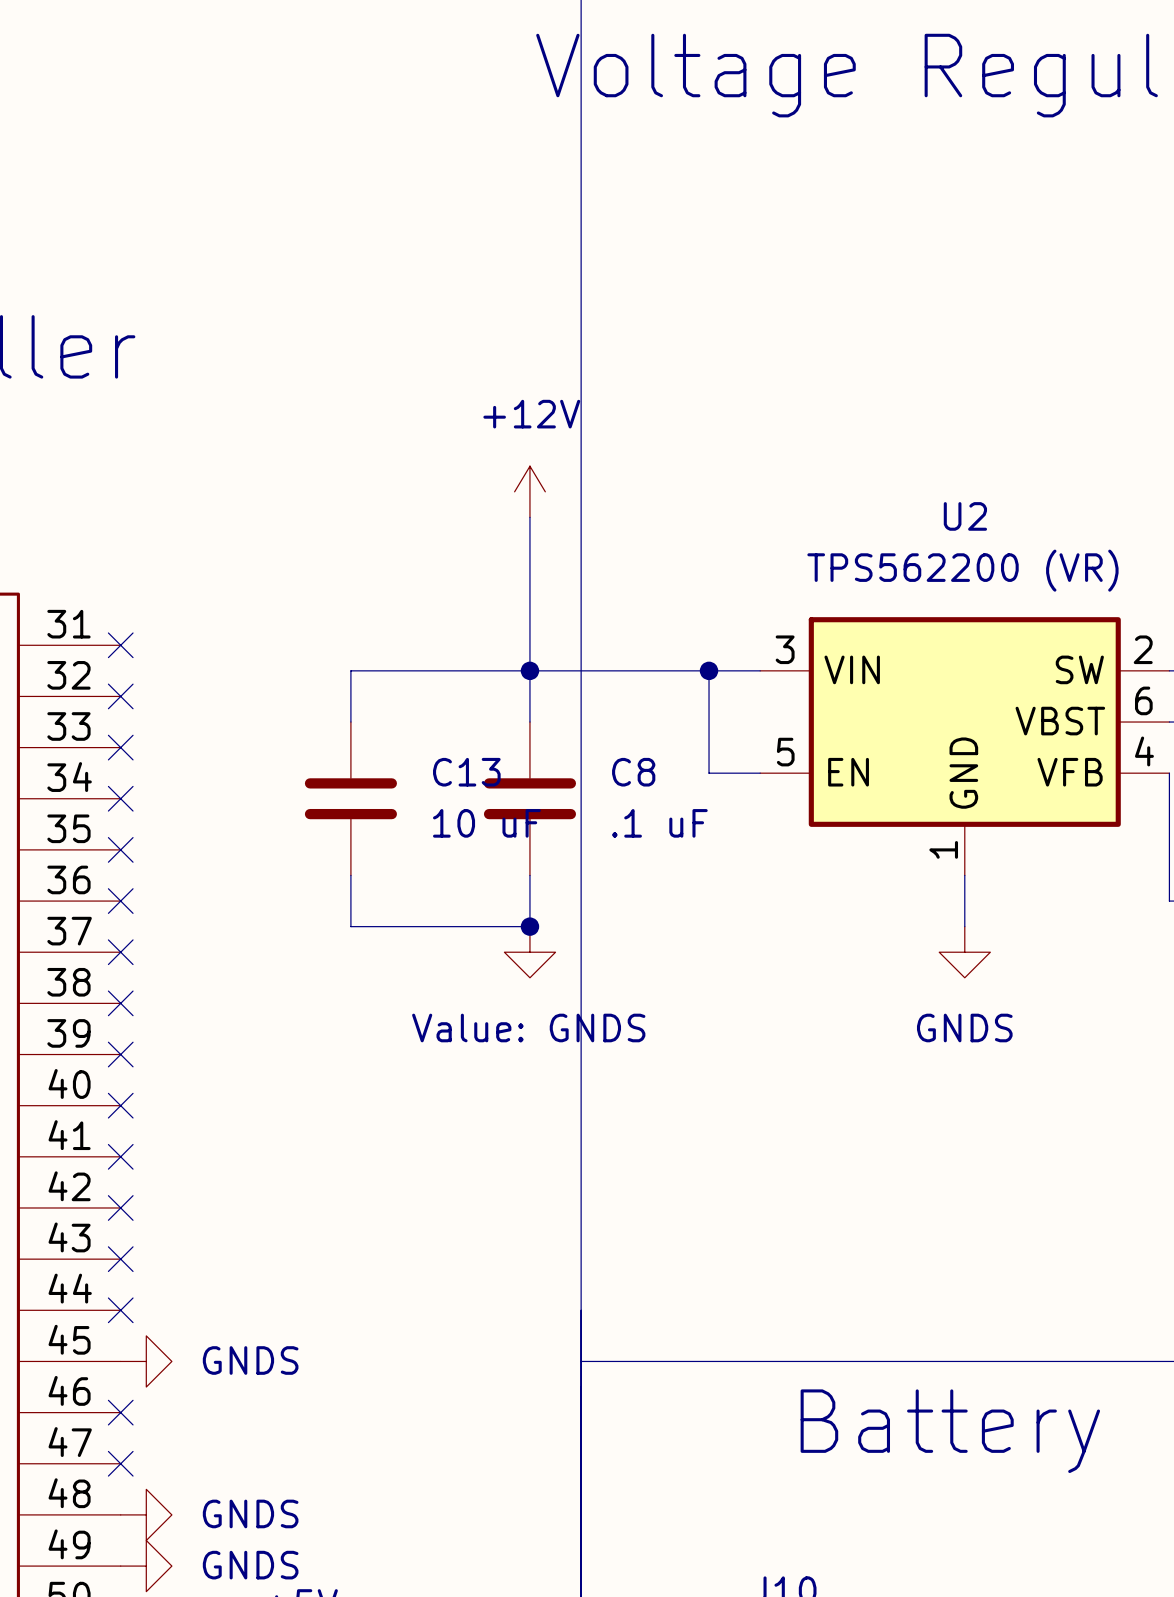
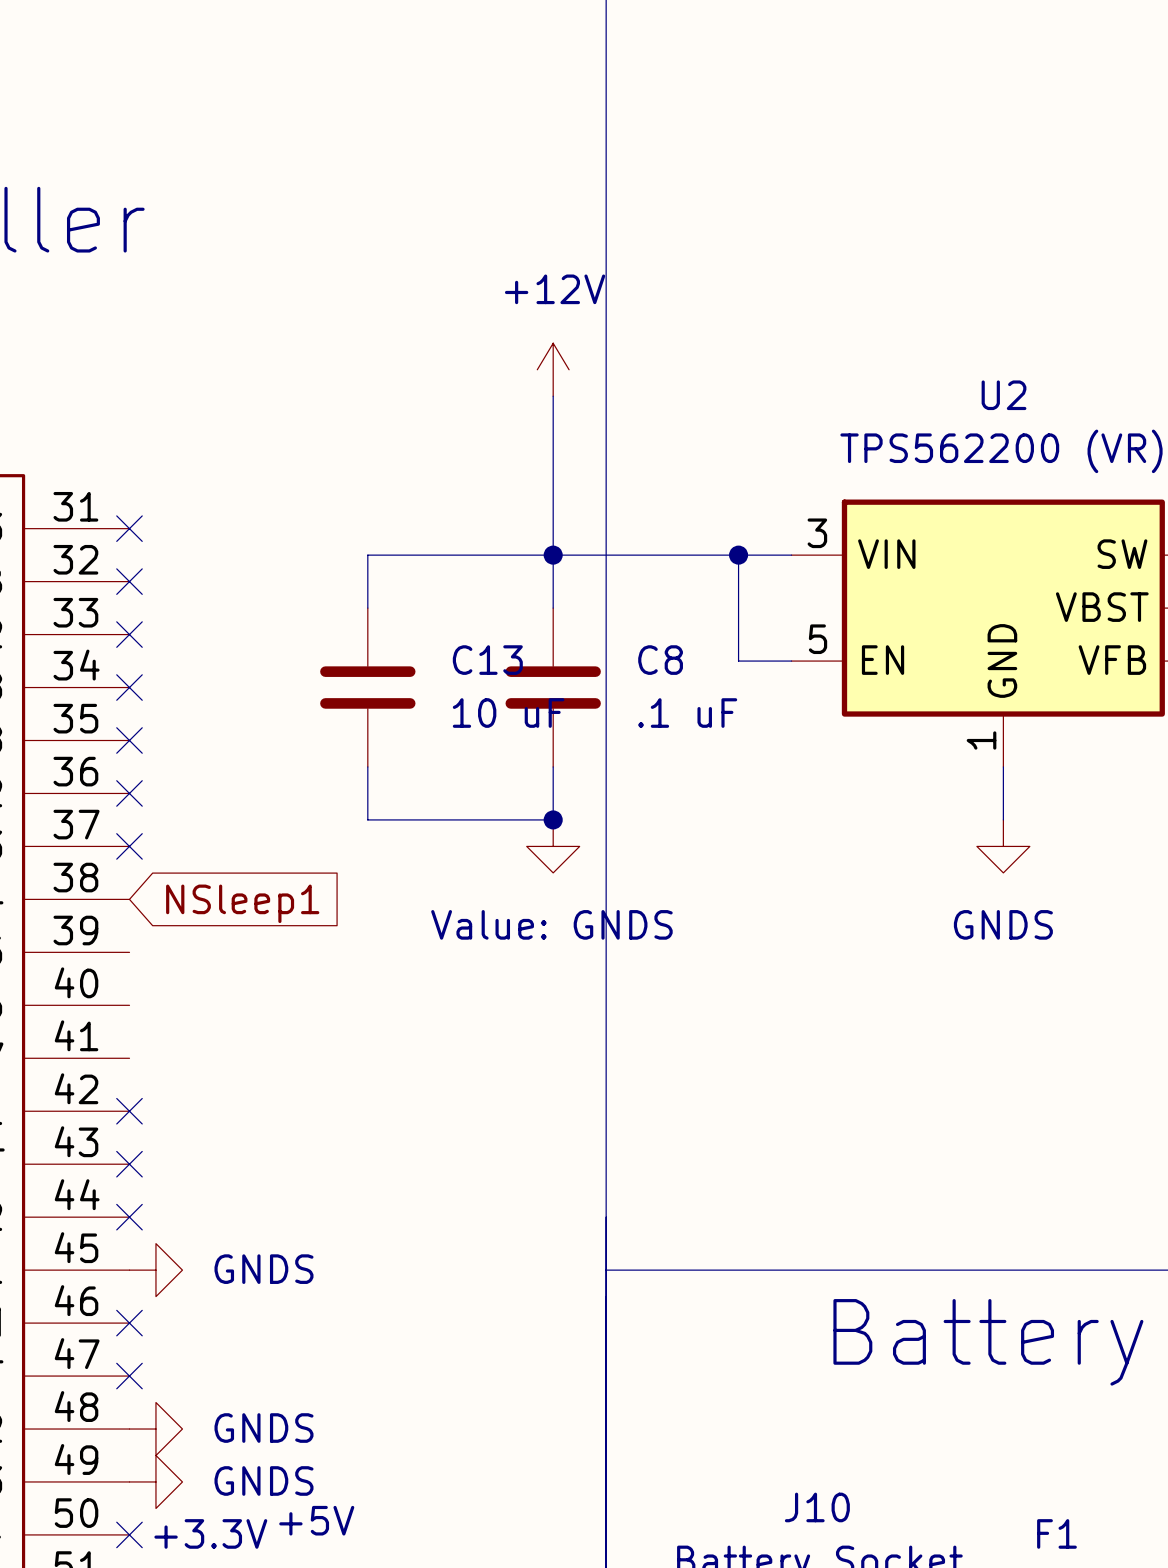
no-connect mark: (120, 1003) -> none
global label: none -> NSleep1 (242, 903)
no-connect mark: (120, 1054) -> none
no-connect mark: (120, 1105) -> none
no-connect mark: (120, 1156) -> none

